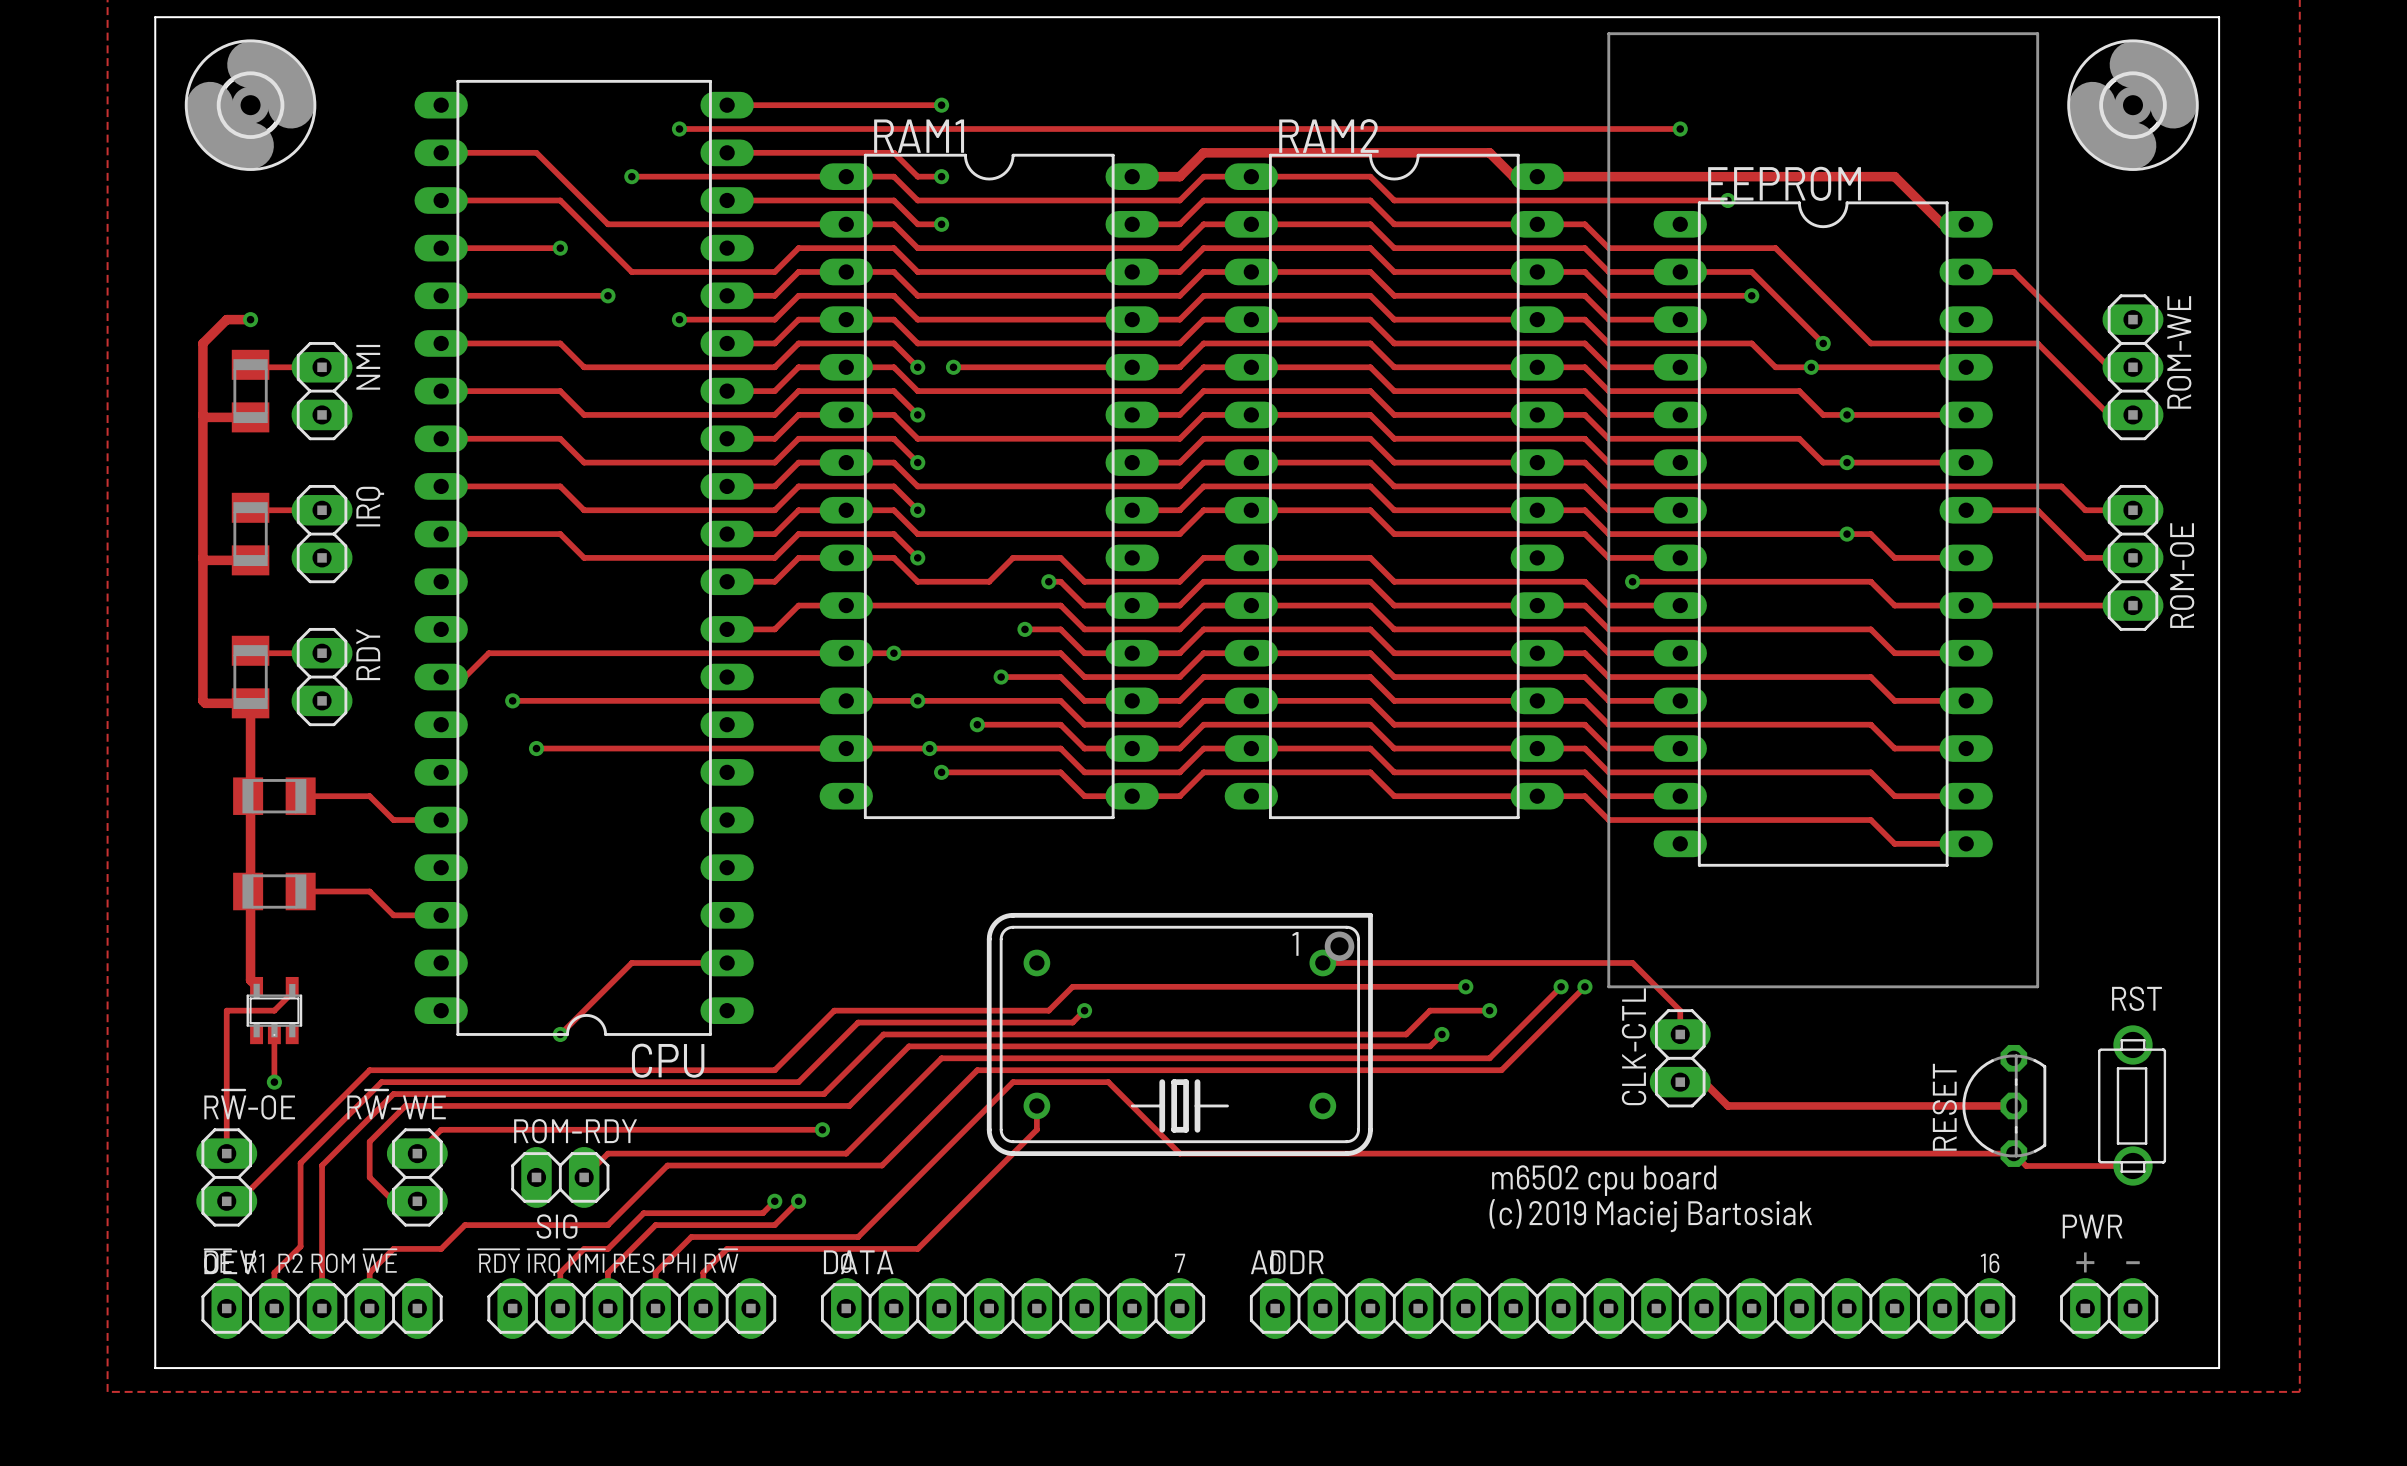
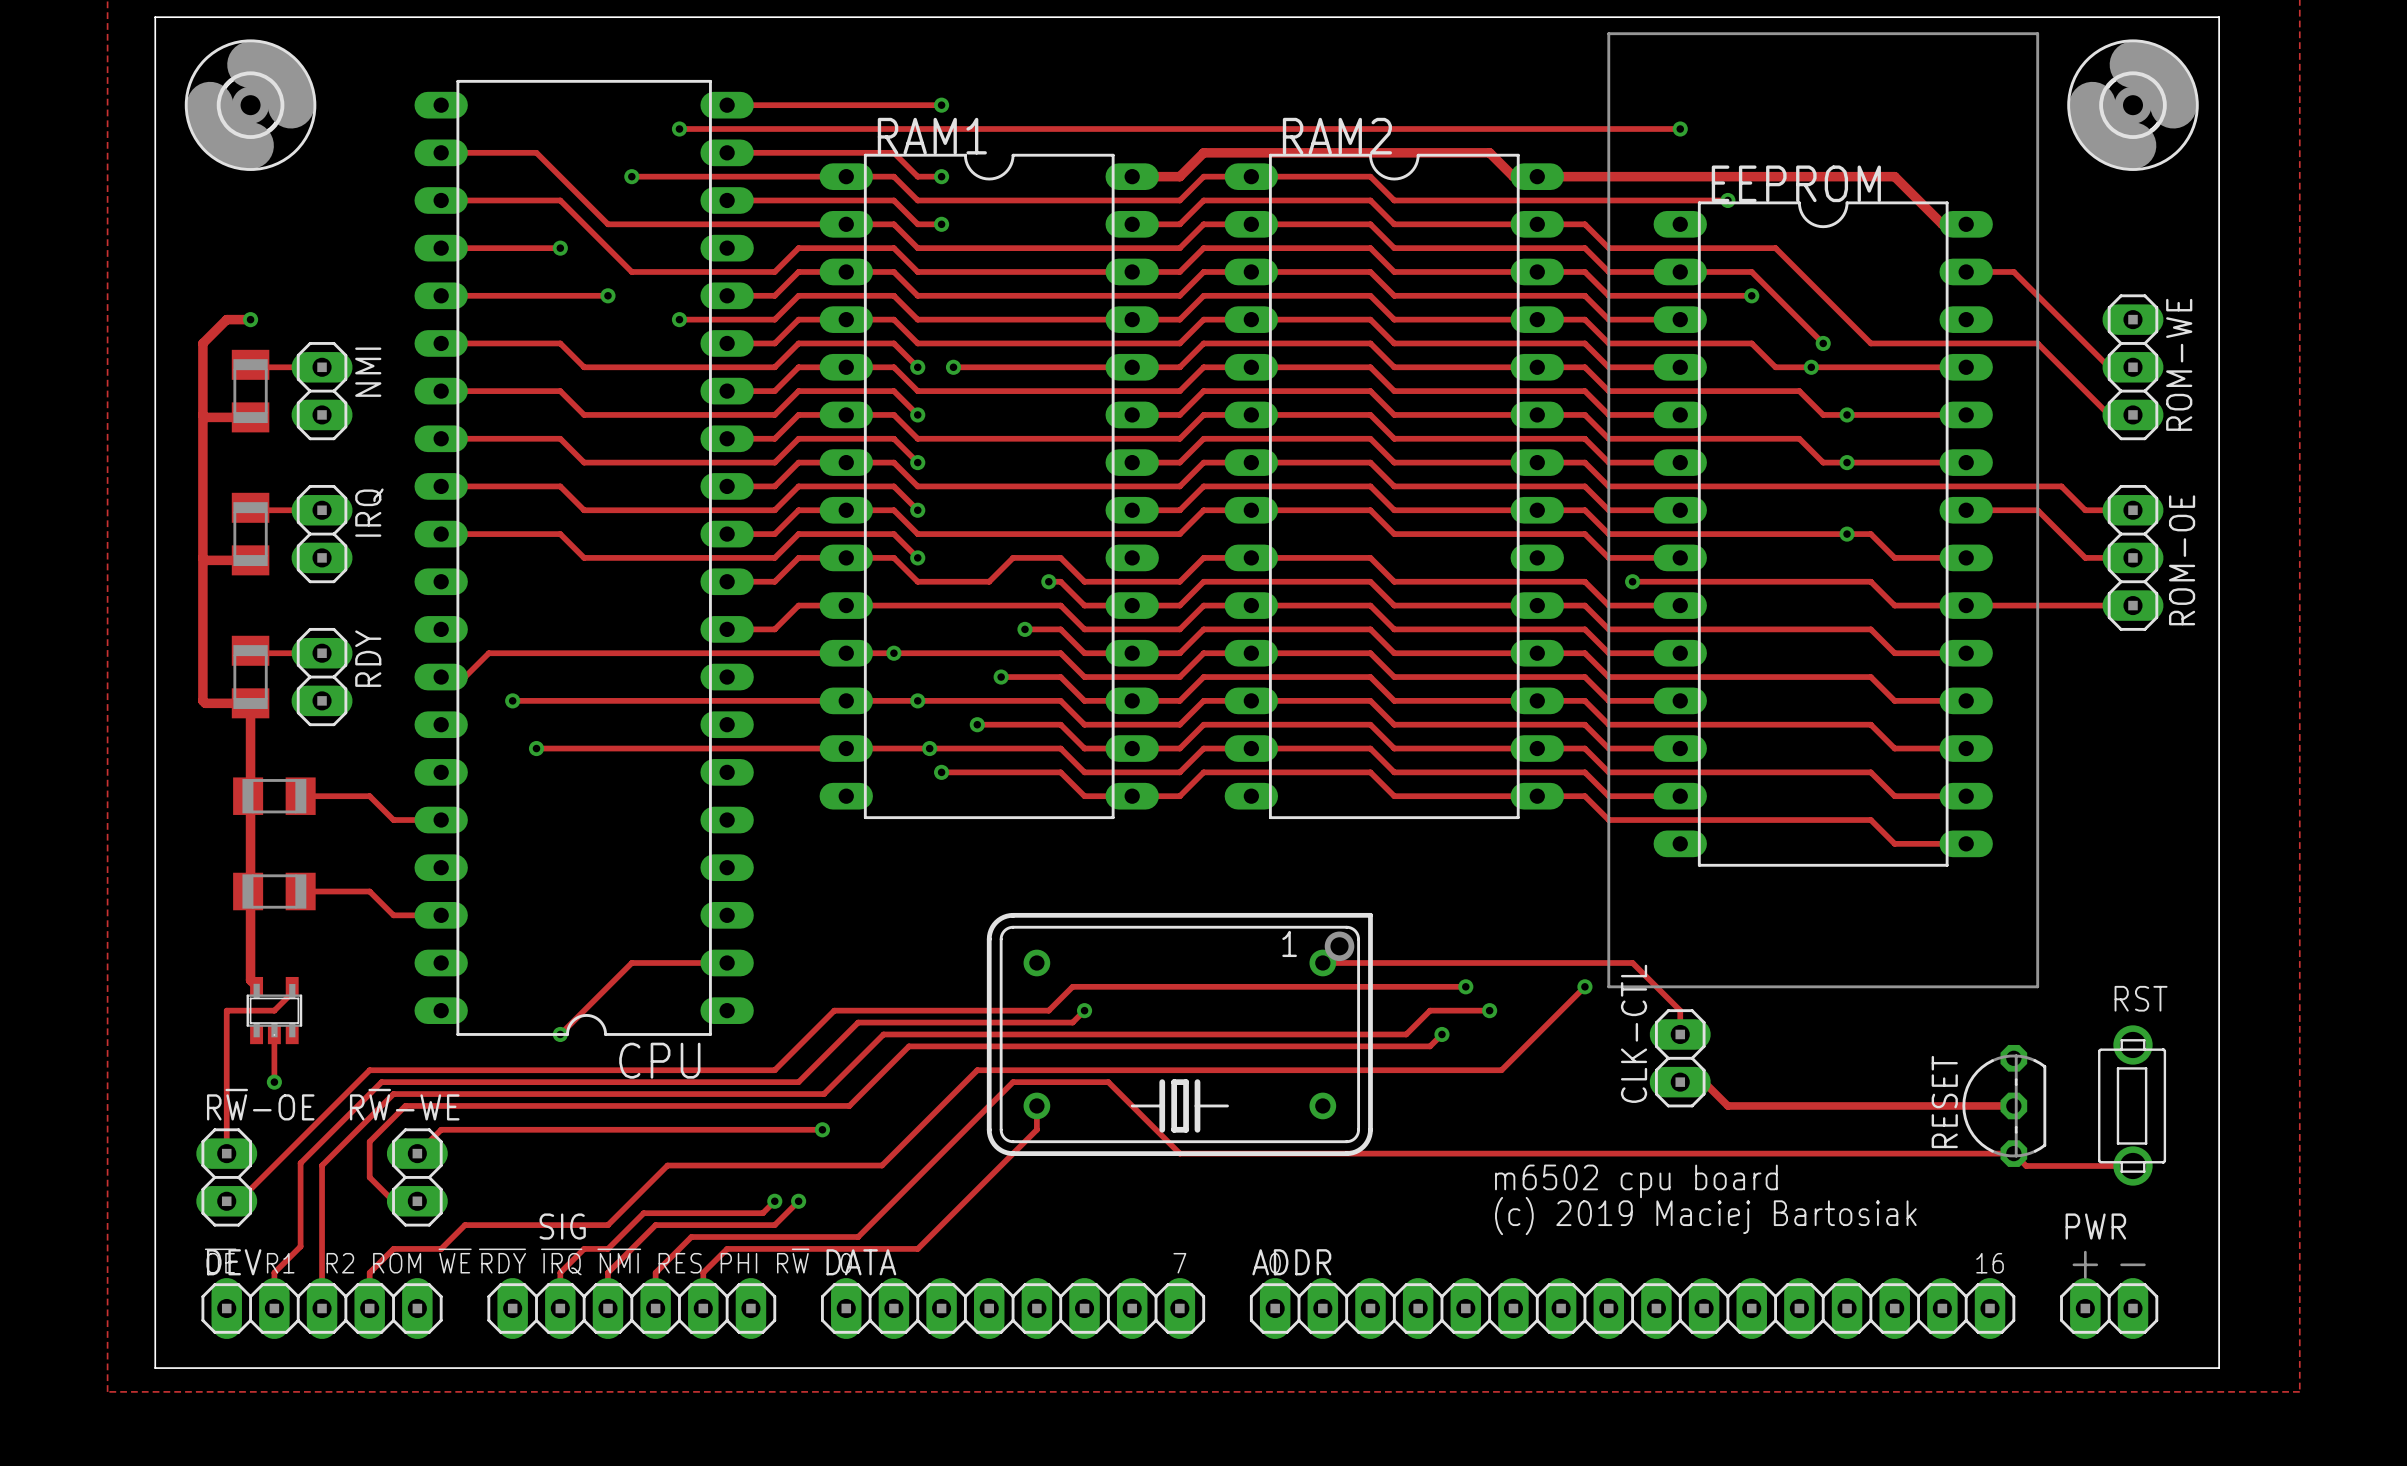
track: (1561, 986) (1489, 1058) (941, 1058) (846, 1153) (607, 1153) (584, 1177) -> none
via: (1561, 986) -> none
ROM-RDY: (560, 1177) -> none

